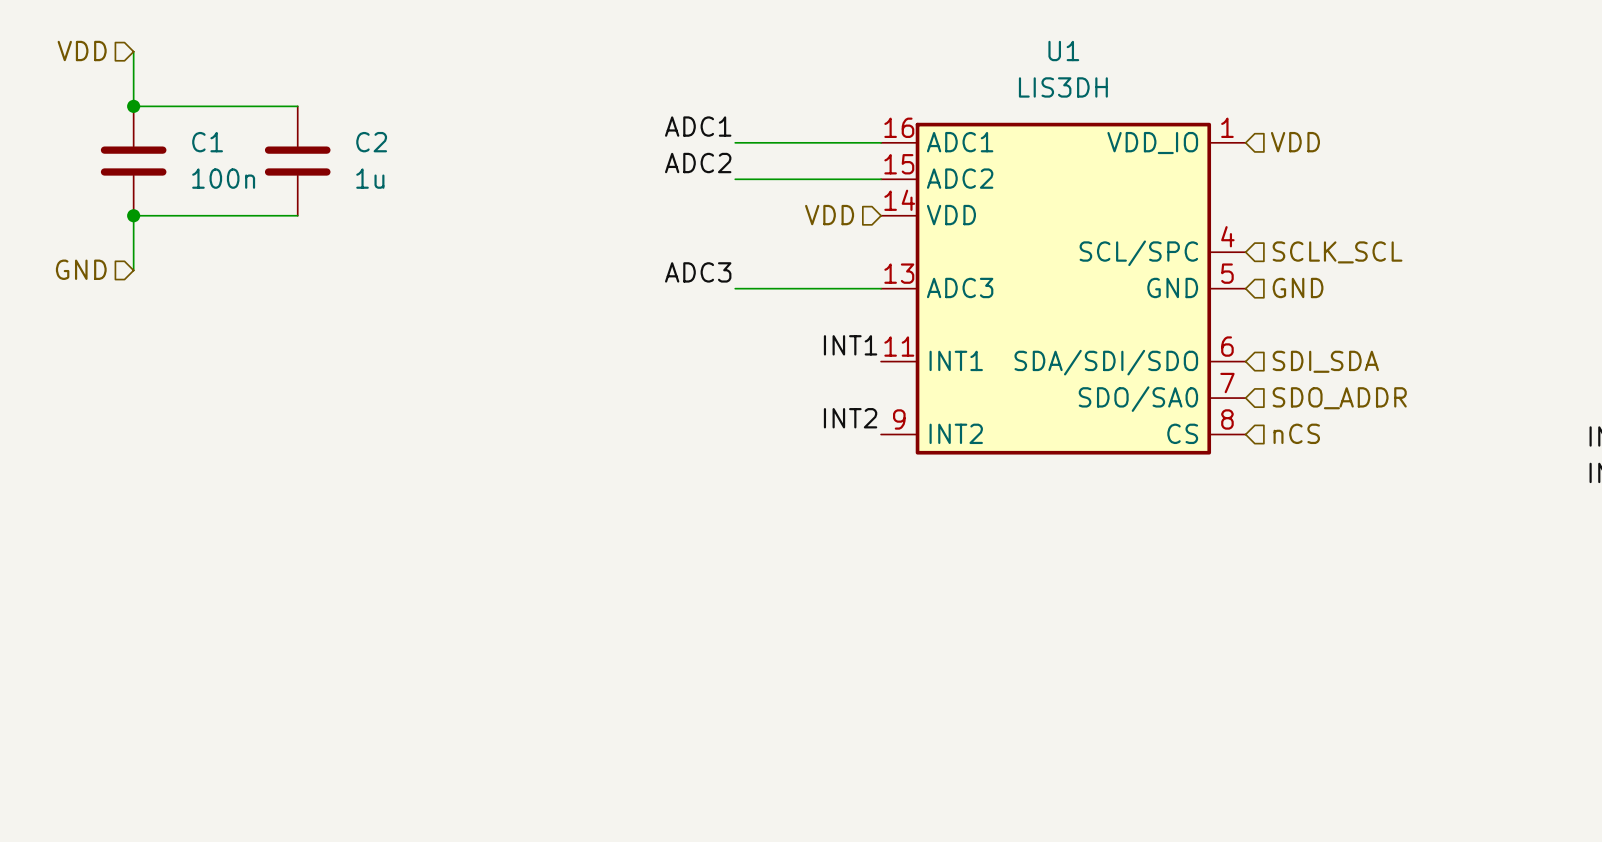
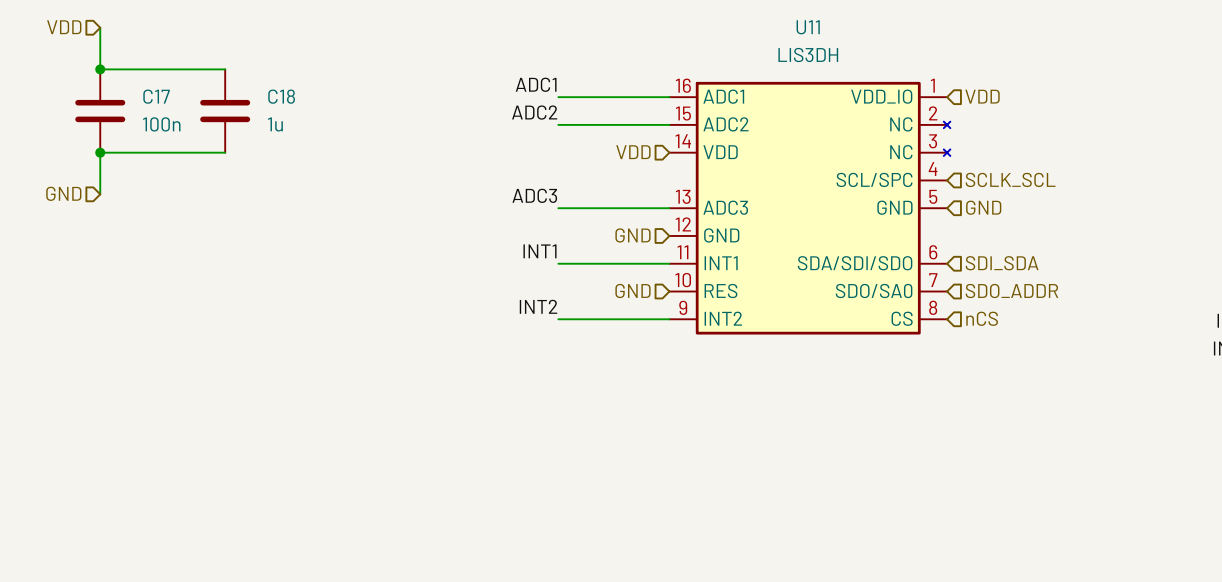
C1 name: C1 (207, 142) -> C17 (156, 96)
C2 name: C2 (371, 142) -> C18 (281, 96)
U1: LIS3DH (1063, 288) -> none
U11: none -> LIS3DH (809, 208)
hierarchical label: none -> GND (632, 235)
label position: INT1 (850, 345) -> INT1 (539, 251)
wire: none -> (558, 263) (669, 263)
hierarchical label: none -> GND (632, 290)
label position: INT2 (850, 418) -> INT2 (538, 306)
wire: none -> (558, 319) (669, 319)

